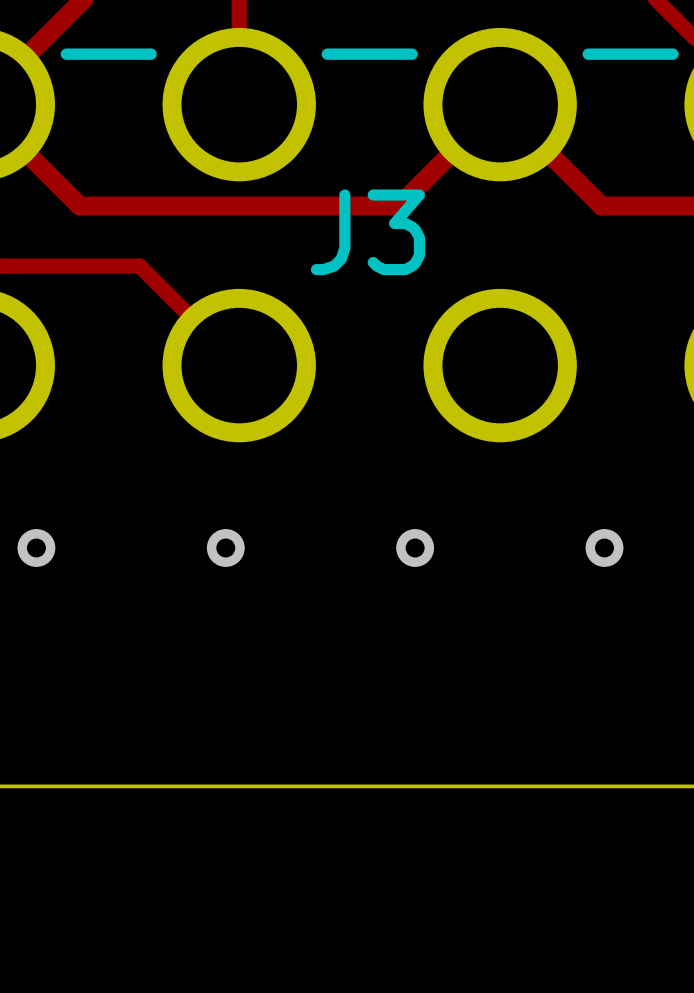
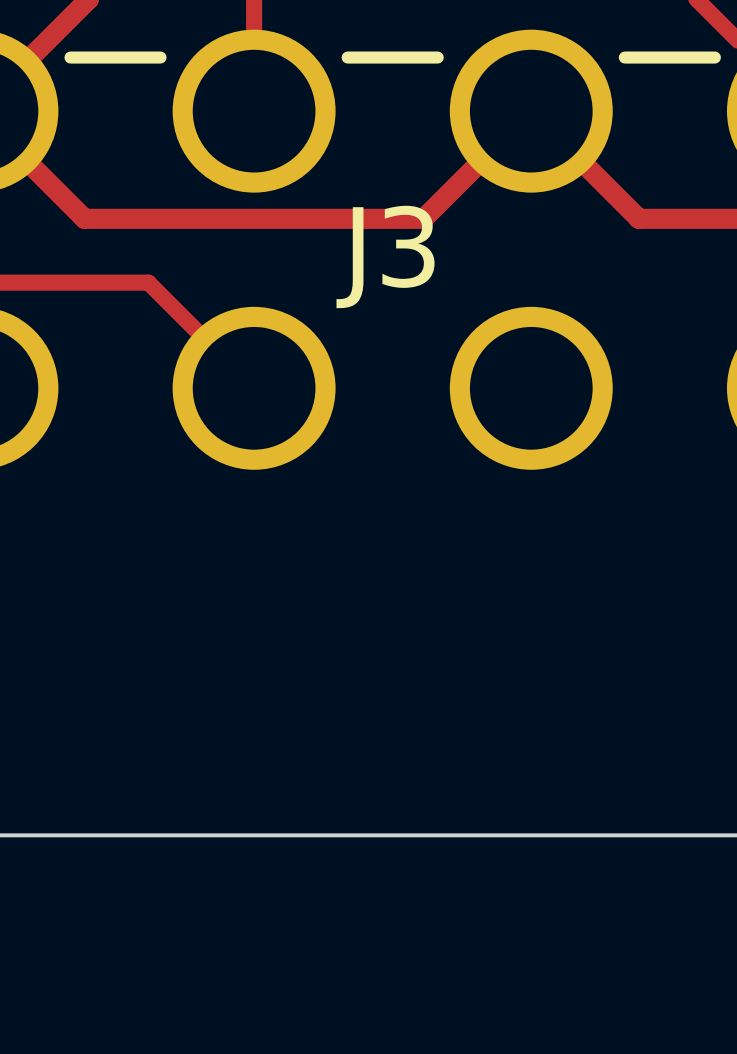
via: (36, 547) -> none
via: (225, 547) -> none
via: (415, 547) -> none
via: (604, 547) -> none

